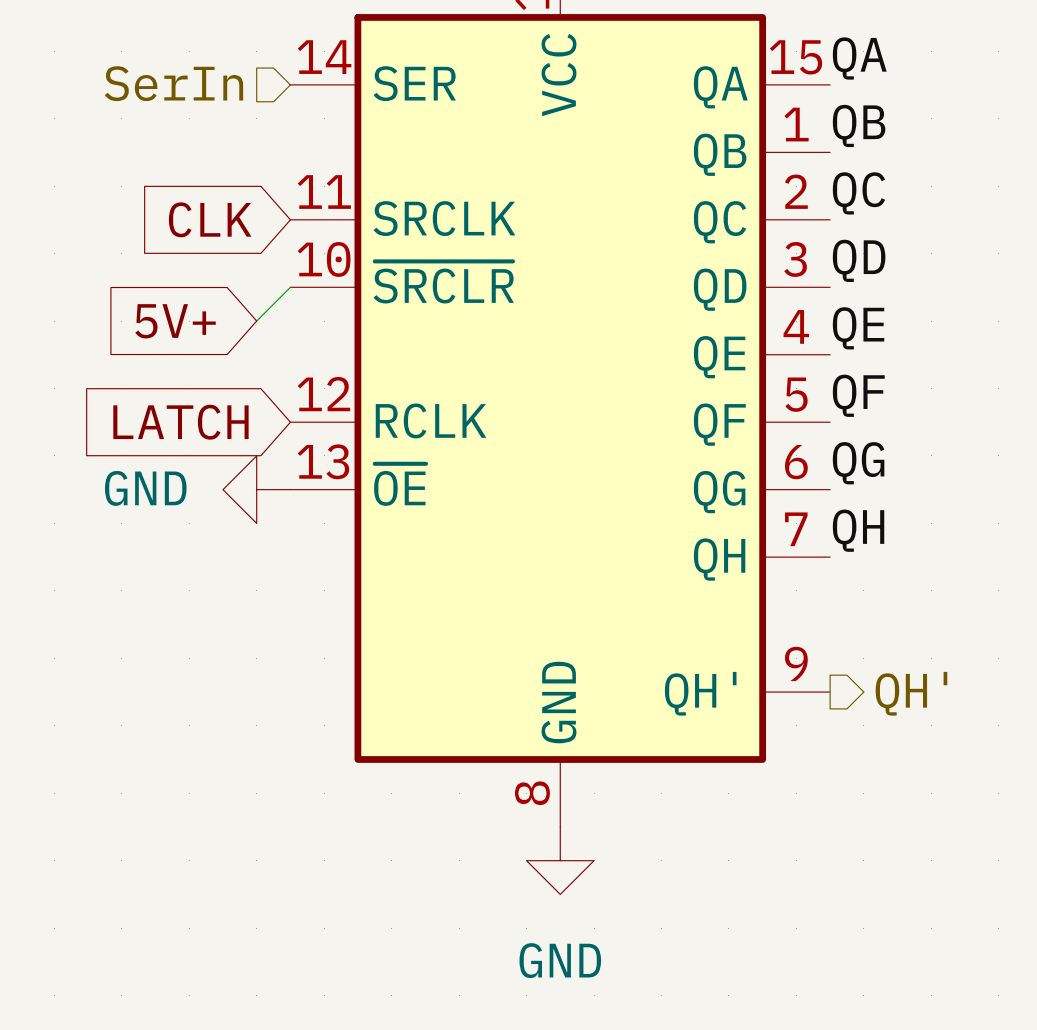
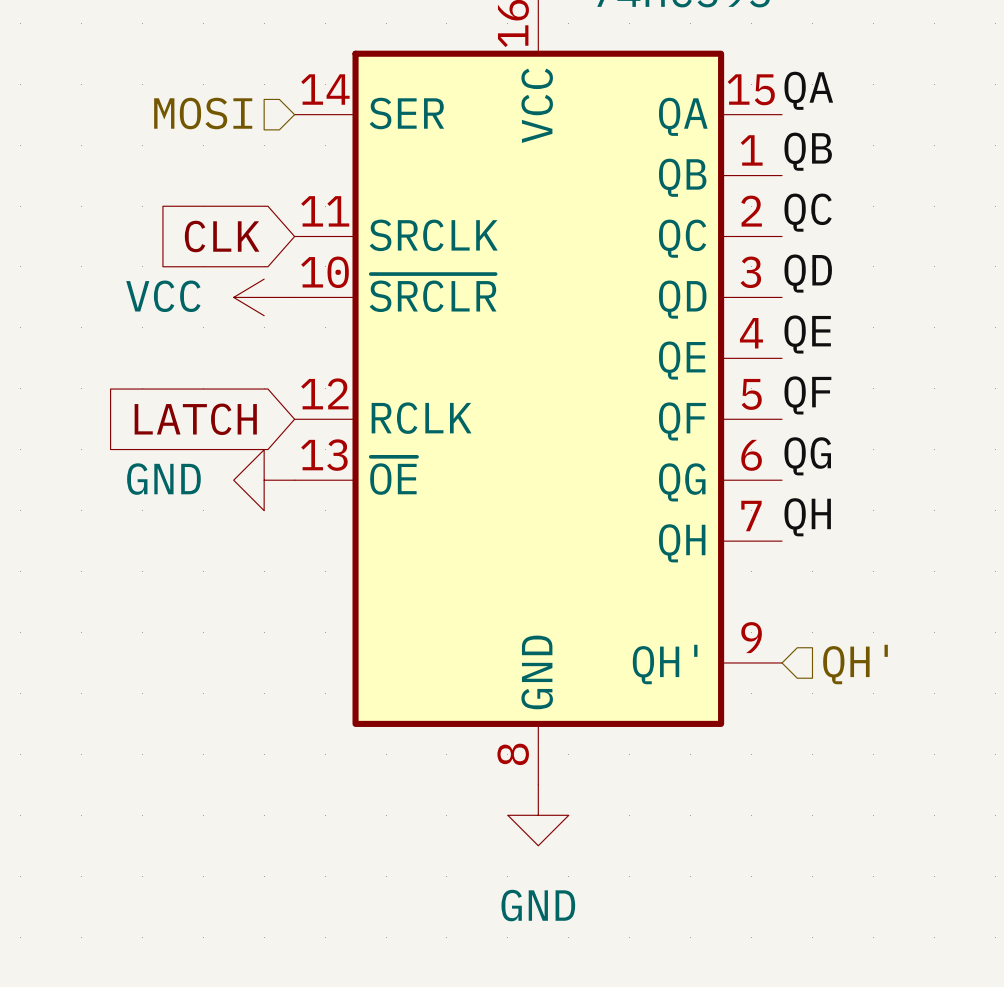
hierarchical label: SerIn (173, 83) -> MOSI (203, 113)
power symbol: none -> VCC (264, 297)
wire: (290, 287) (256, 321) -> none
global label: 5V+ (175, 321) -> none
hierarchical label shape: output (911, 693) -> input (855, 664)

